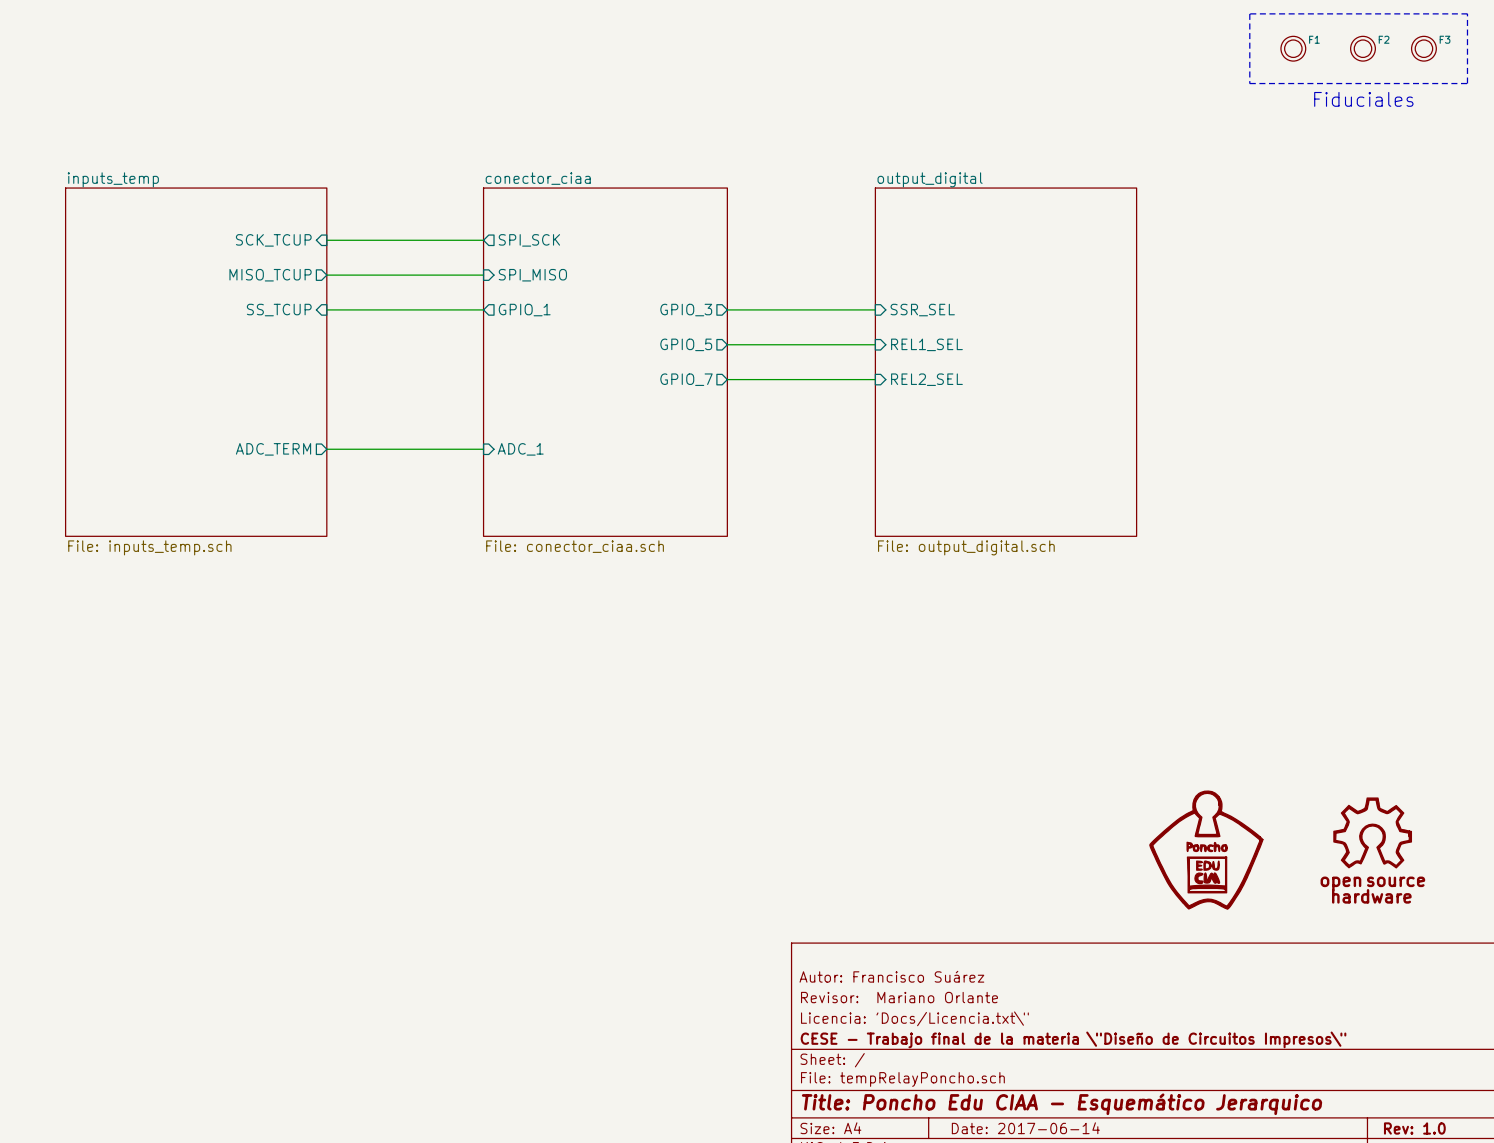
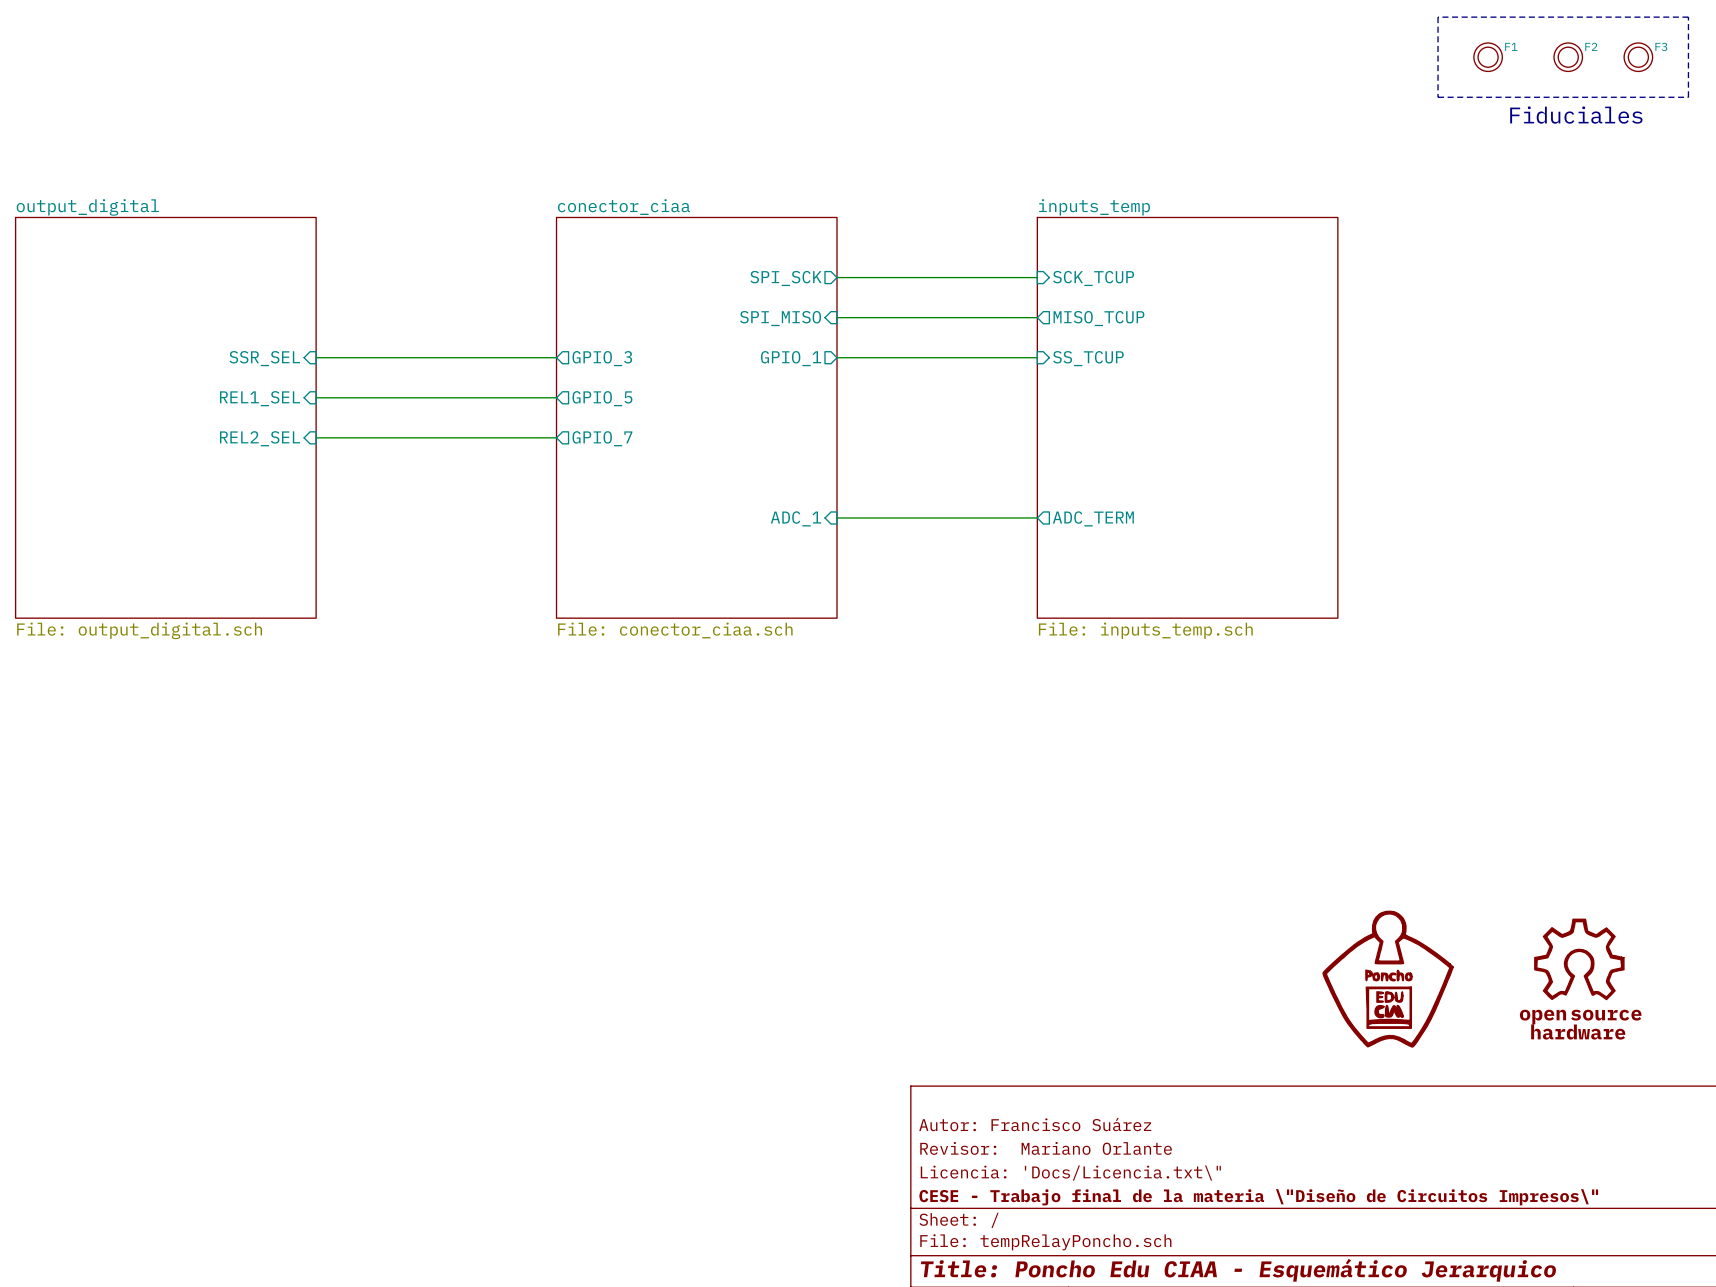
sheet pin: SCK_TCUP (273, 240) -> none
wire: (326, 240) (483, 240) -> none
sheet pin: SPI_SCK (529, 240) -> none
sheet pin: none -> SPI_SCK (786, 278)
wire: none -> (837, 277) (1037, 277)
sheet pin: none -> SCK_TCUP (1093, 278)
sheet pin: MISO_TCUP (270, 275) -> none
wire: (326, 275) (483, 275) -> none
sheet pin: SPI_MISO (532, 275) -> none
sheet pin: none -> SPI_MISO (780, 318)
wire: none -> (837, 317) (1037, 317)
sheet pin: none -> MISO_TCUP (1098, 318)
wire: none -> (316, 357) (376, 357)
wire: none -> (1007, 357) (1037, 357)
sheet pin: none -> SSR_SEL (264, 358)
sheet pin: SS_TCUP (279, 310) -> none
sheet pin: GPIO_1 (524, 310) -> GPIO_3 (602, 358)
sheet pin: GPIO_3 (686, 310) -> GPIO_1 (791, 358)
sheet pin: SSR_SEL (922, 310) -> none
sheet pin: none -> SS_TCUP (1088, 358)
sheet pin: none -> REL1_SEL (259, 398)
wire: none -> (316, 397) (556, 397)
sheet pin: none -> GPIO_5 (602, 398)
sheet pin: GPIO_5 (686, 344) -> none
wire: (727, 344) (875, 344) -> none
sheet pin: REL1_SEL (926, 344) -> none
sheet output_digital: none -> File: output_digital.sch (165, 417)
sheet inputs_temp: File: inputs_temp.sch (196, 362) -> none
sheet output_digital: File: output_digital.sch (1005, 362) -> none
sheet inputs_temp: none -> File: inputs_temp.sch (1187, 417)
sheet pin: none -> REL2_SEL (259, 438)
wire: none -> (316, 437) (556, 437)
sheet pin: none -> GPIO_7 (602, 438)
sheet pin: GPIO_7 (686, 379) -> none
wire: (727, 379) (875, 379) -> none
sheet pin: REL2_SEL (926, 379) -> none
sheet pin: ADC_TERM (273, 449) -> none
wire: (326, 449) (483, 449) -> none
sheet pin: ADC_1 (520, 449) -> none
sheet pin: none -> ADC_1 (796, 518)
wire: none -> (837, 517) (1037, 517)
sheet pin: none -> ADC_TERM (1093, 518)

